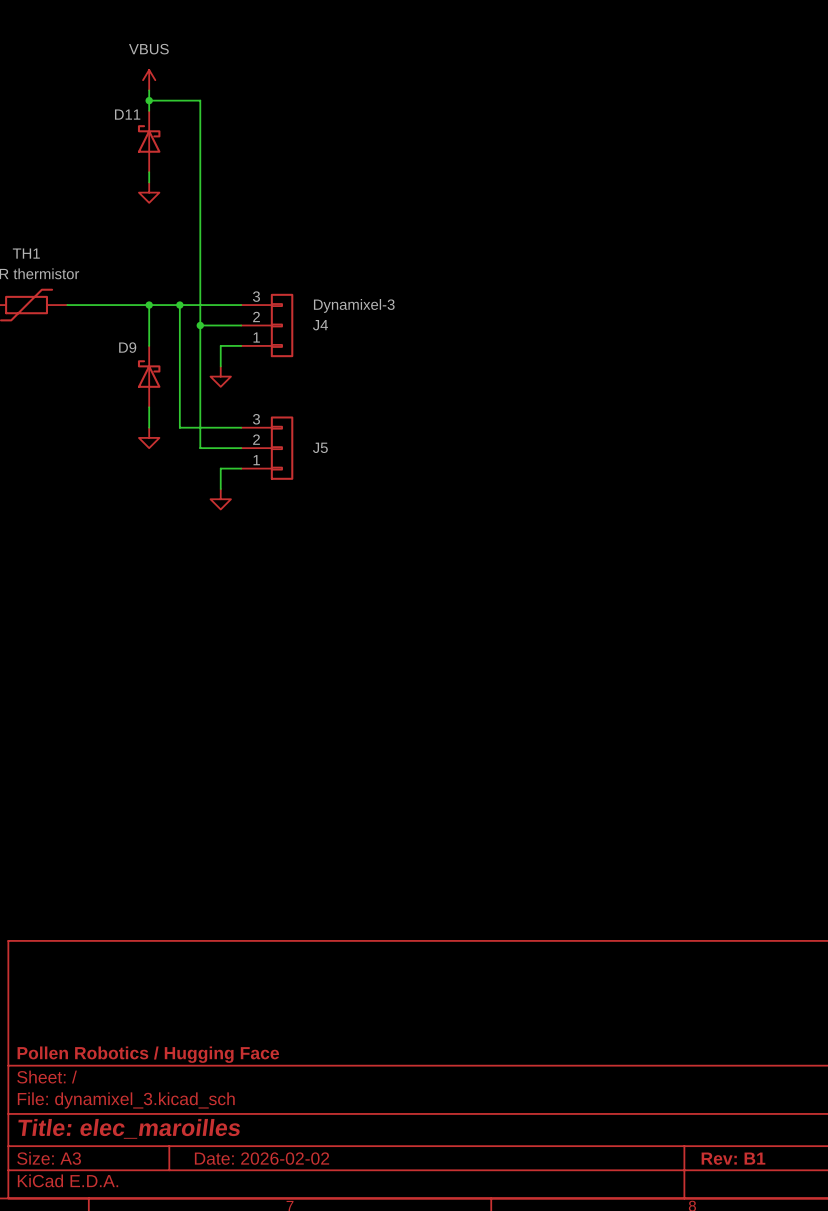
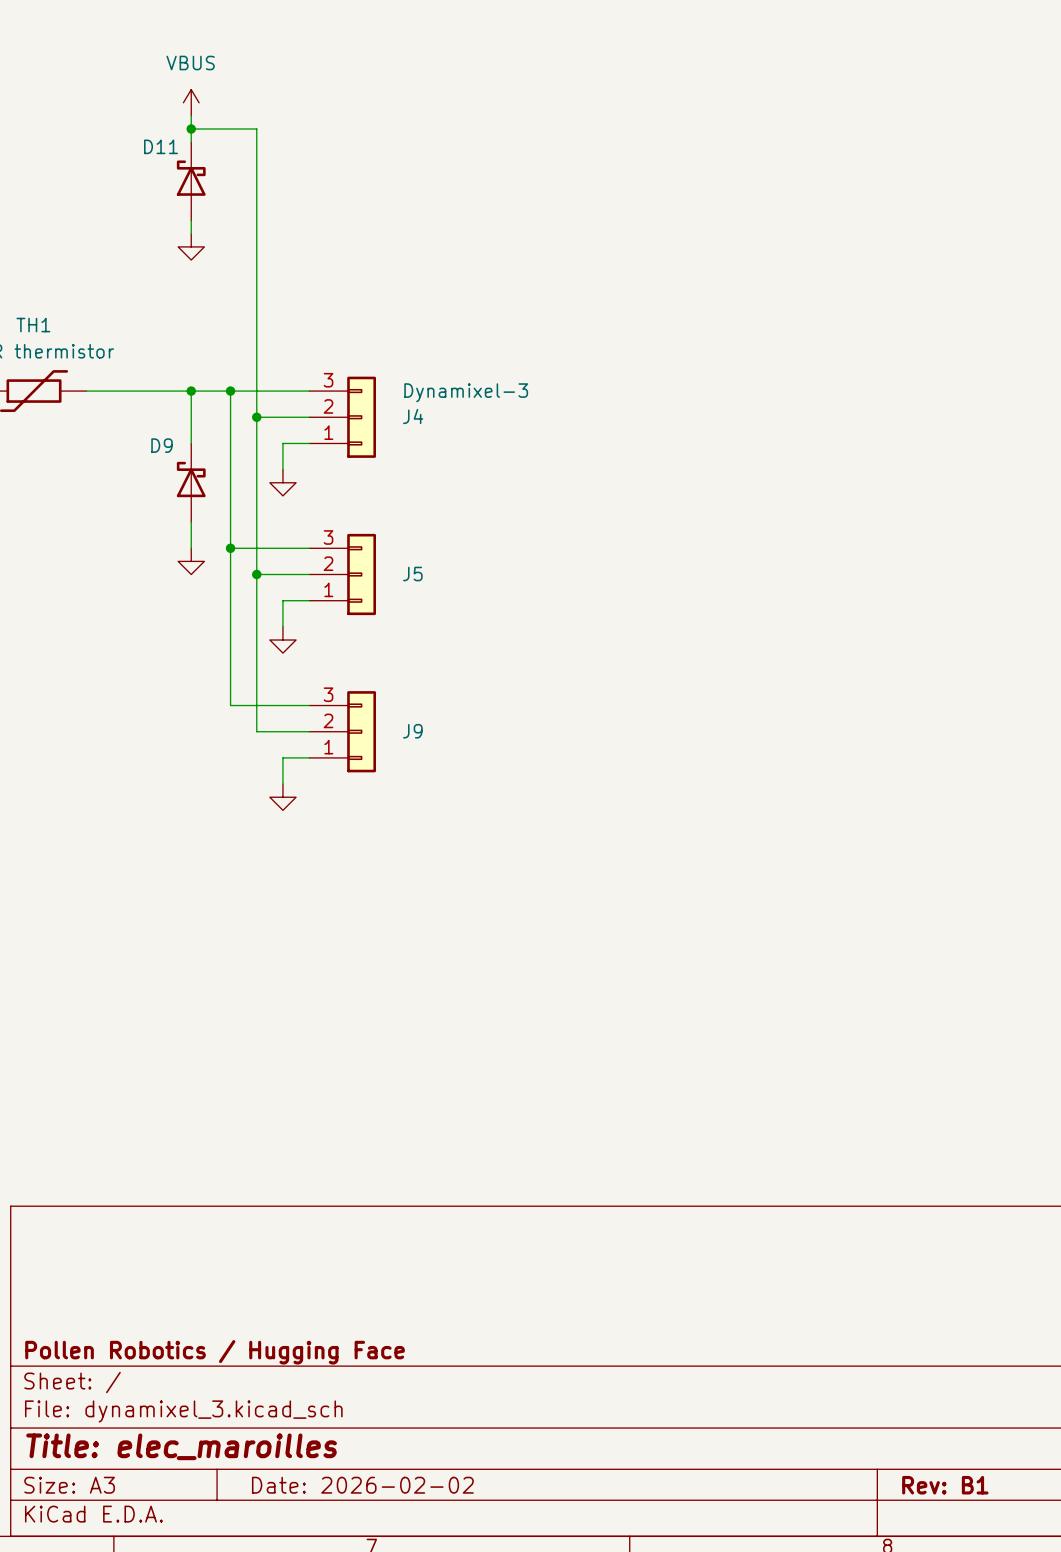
wire: none -> (230, 548) (230, 705) (309, 705)
junction: none -> (230, 548)
wire: none -> (256, 574) (256, 731) (309, 731)
junction: none -> (256, 574)
J9: none -> (342, 731)
wire: none -> (309, 757) (282, 757) (282, 784)
power symbol: none -> (282, 797)

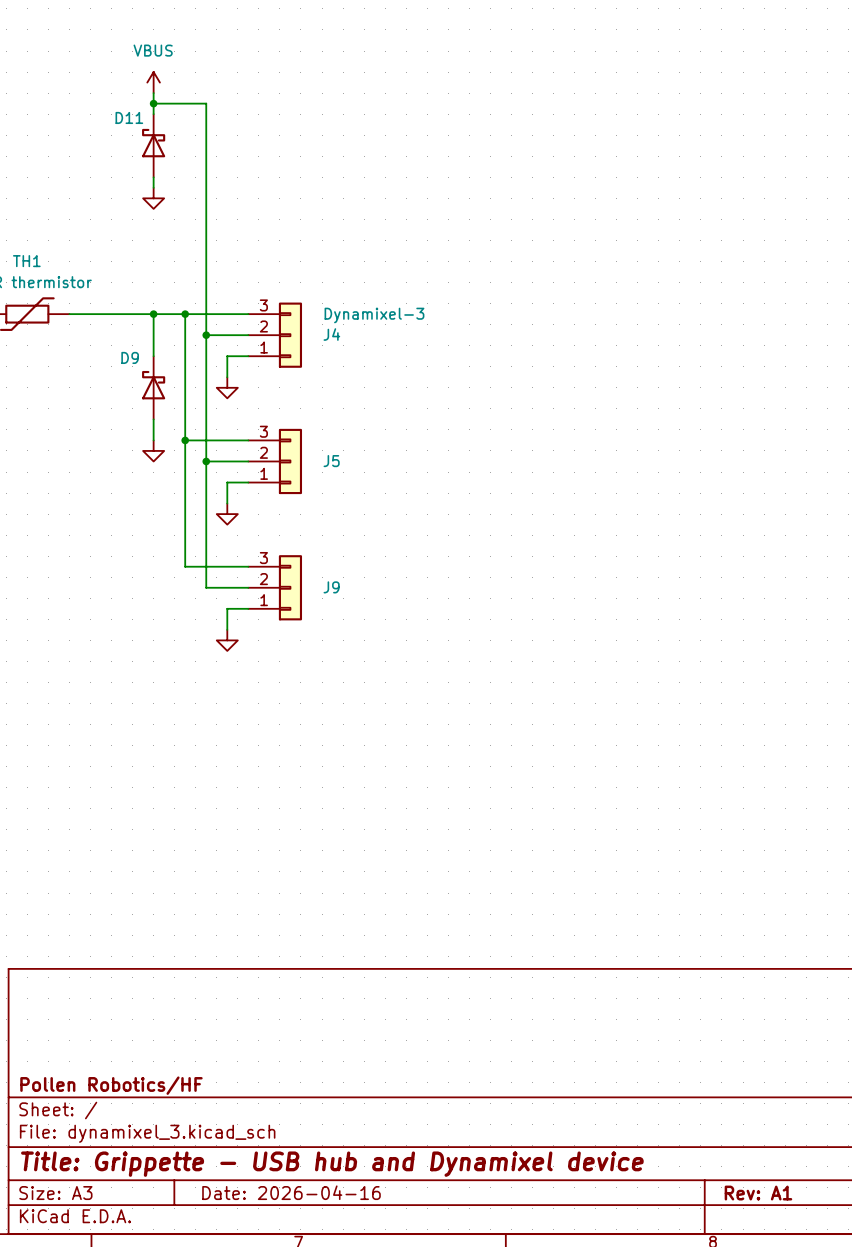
title block: Pollen Robotics / Hugging Face (215, 1352) -> Pollen Robotics/HF (111, 1085)
title block: Title: elec_maroilles (181, 1446) -> Title: Grippette - USB hub and Dynamixel device (332, 1164)
title block: Date: 2026-02-02 (362, 1485) -> Date: 2026-04-16 (291, 1192)
title block: Rev: B1 (945, 1485) -> Rev: A1 (758, 1193)

